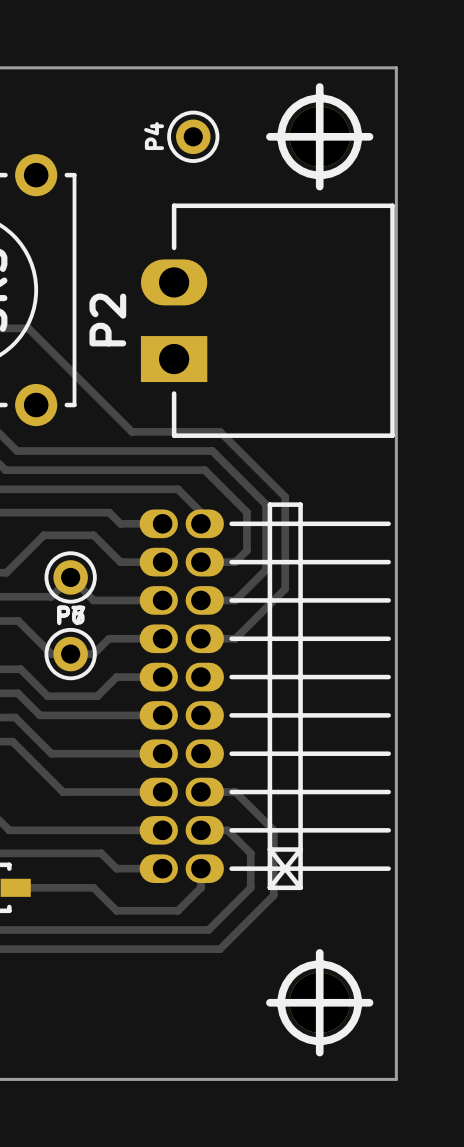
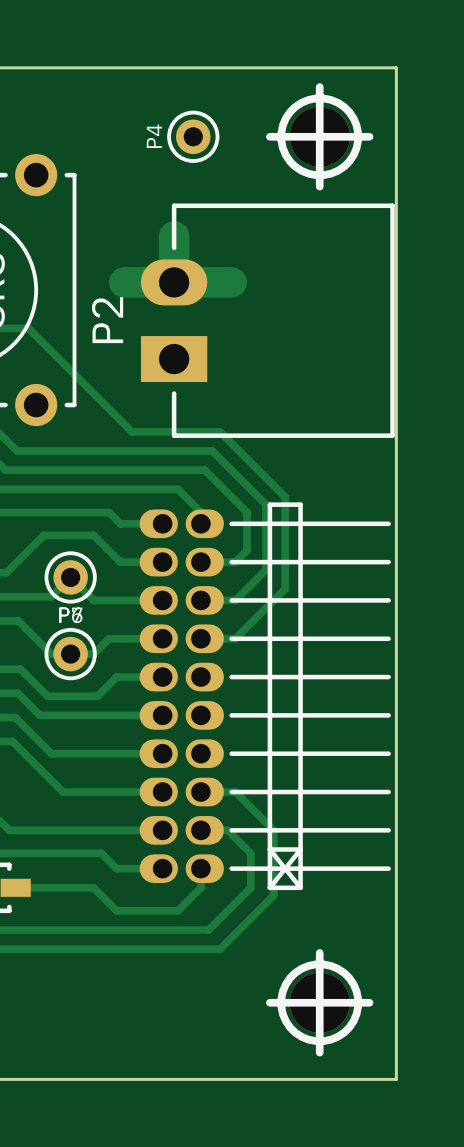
track: none -> (174, 236) (174, 282)
track: none -> (124, 282) (231, 282)

